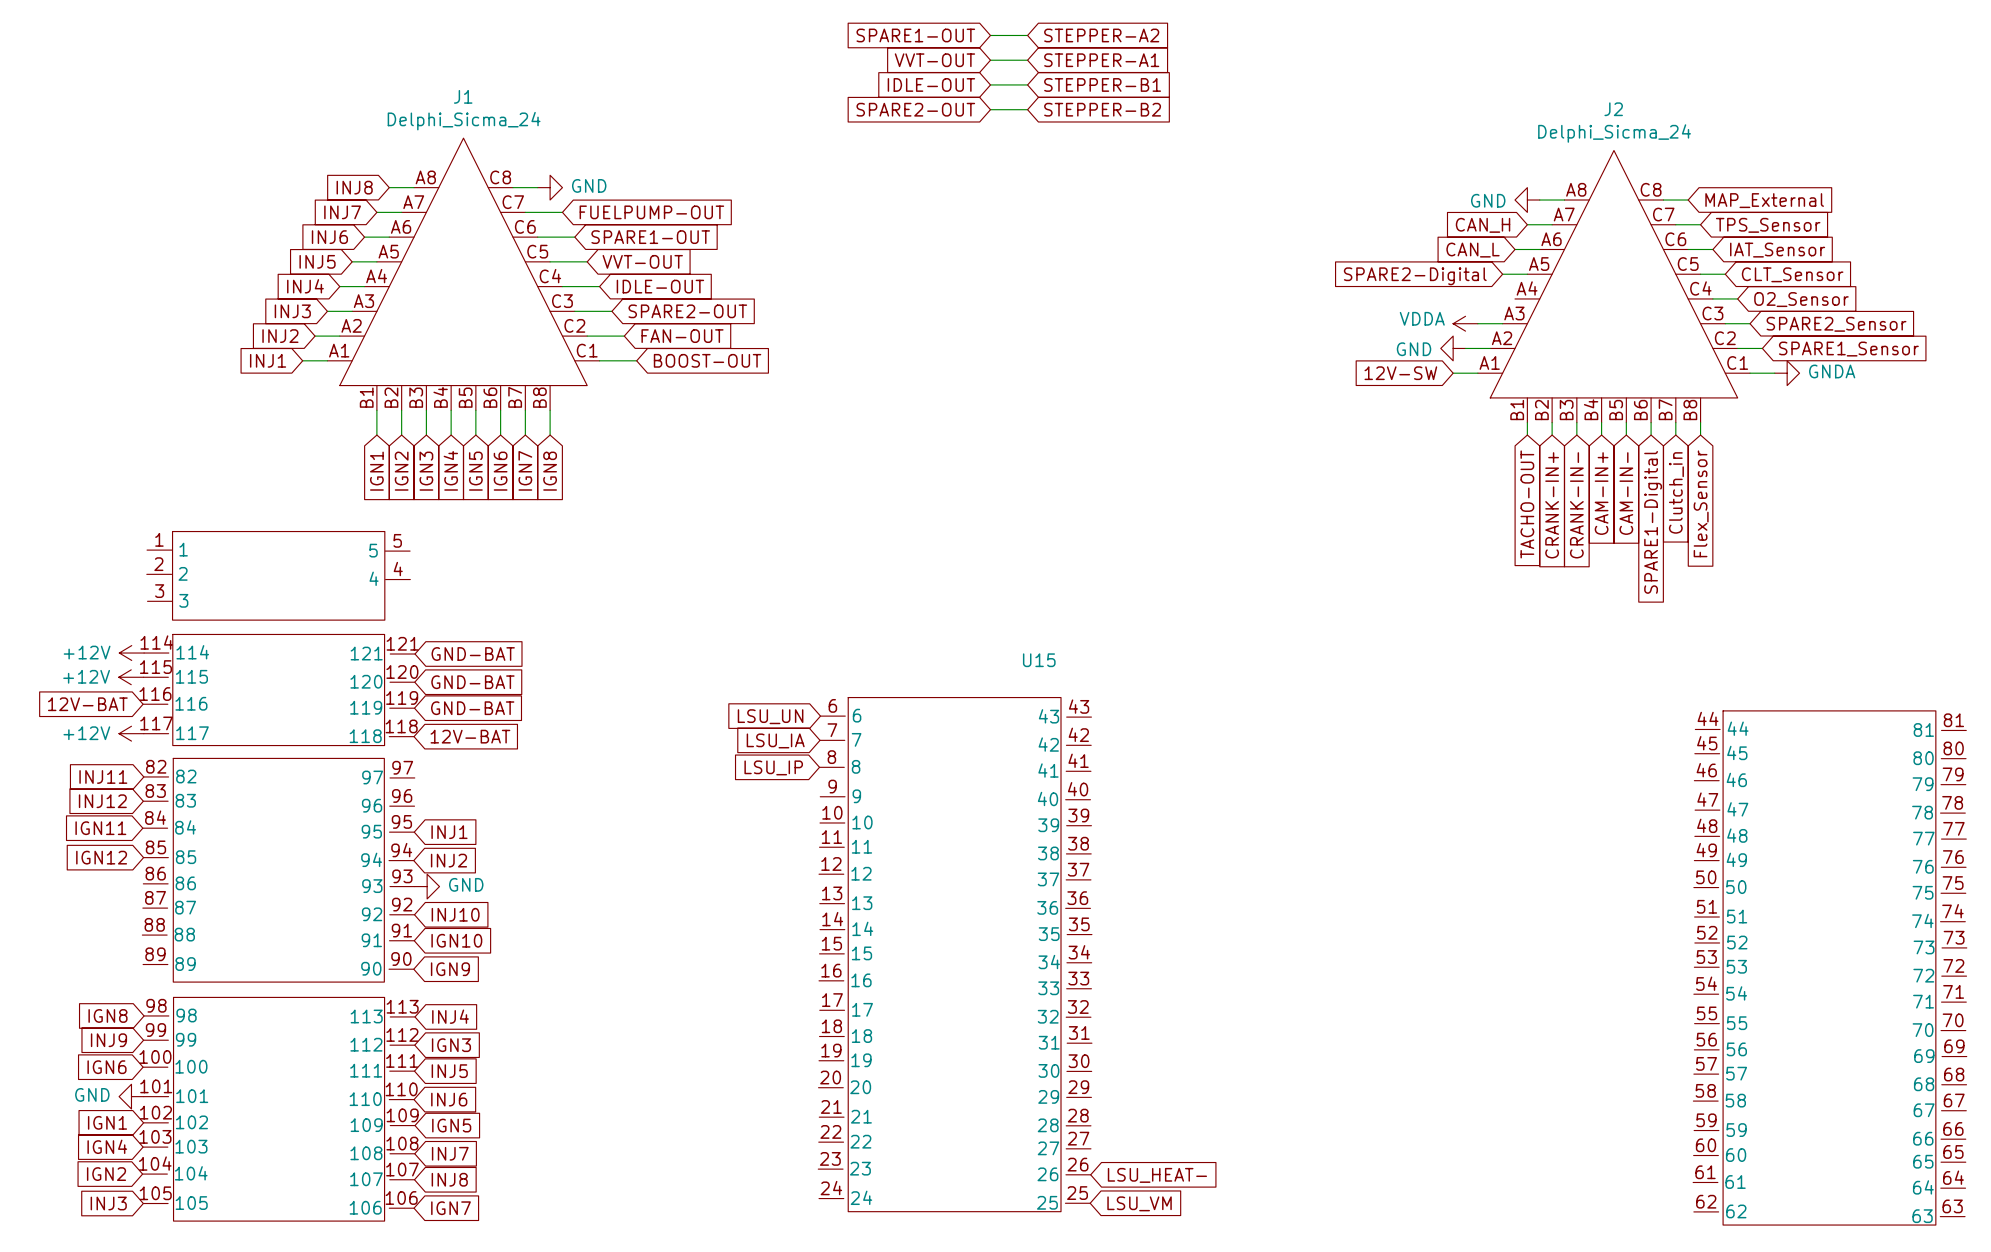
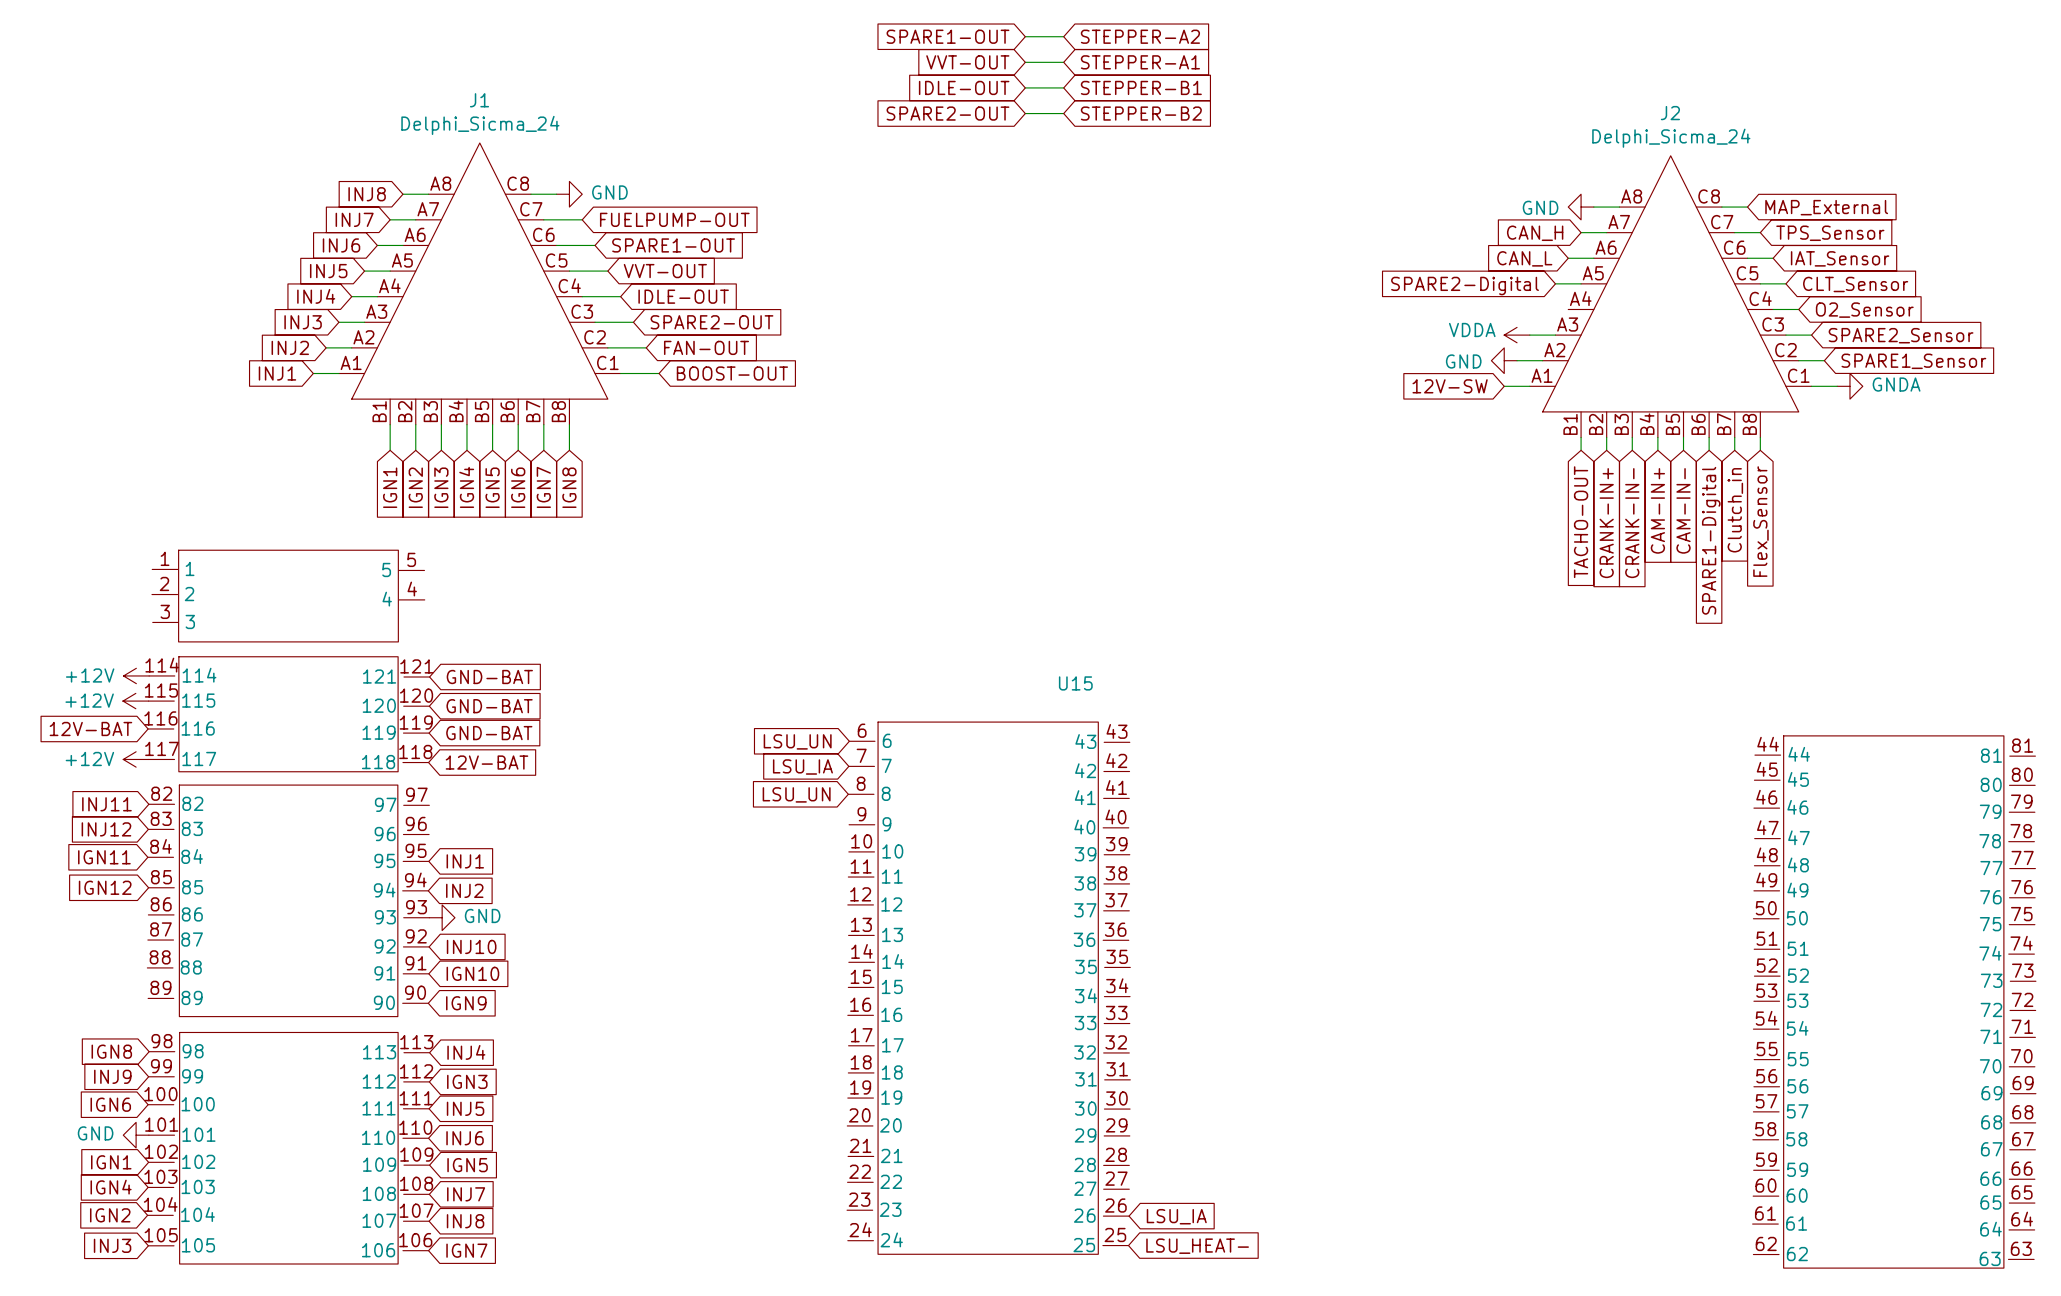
global label: LSU_IP (773, 767) -> LSU_UN (796, 794)
global label: LSU_HEAT- (1157, 1175) -> LSU_IA (1176, 1216)
global label: LSU_VM (1139, 1203) -> LSU_HEAT- (1197, 1246)

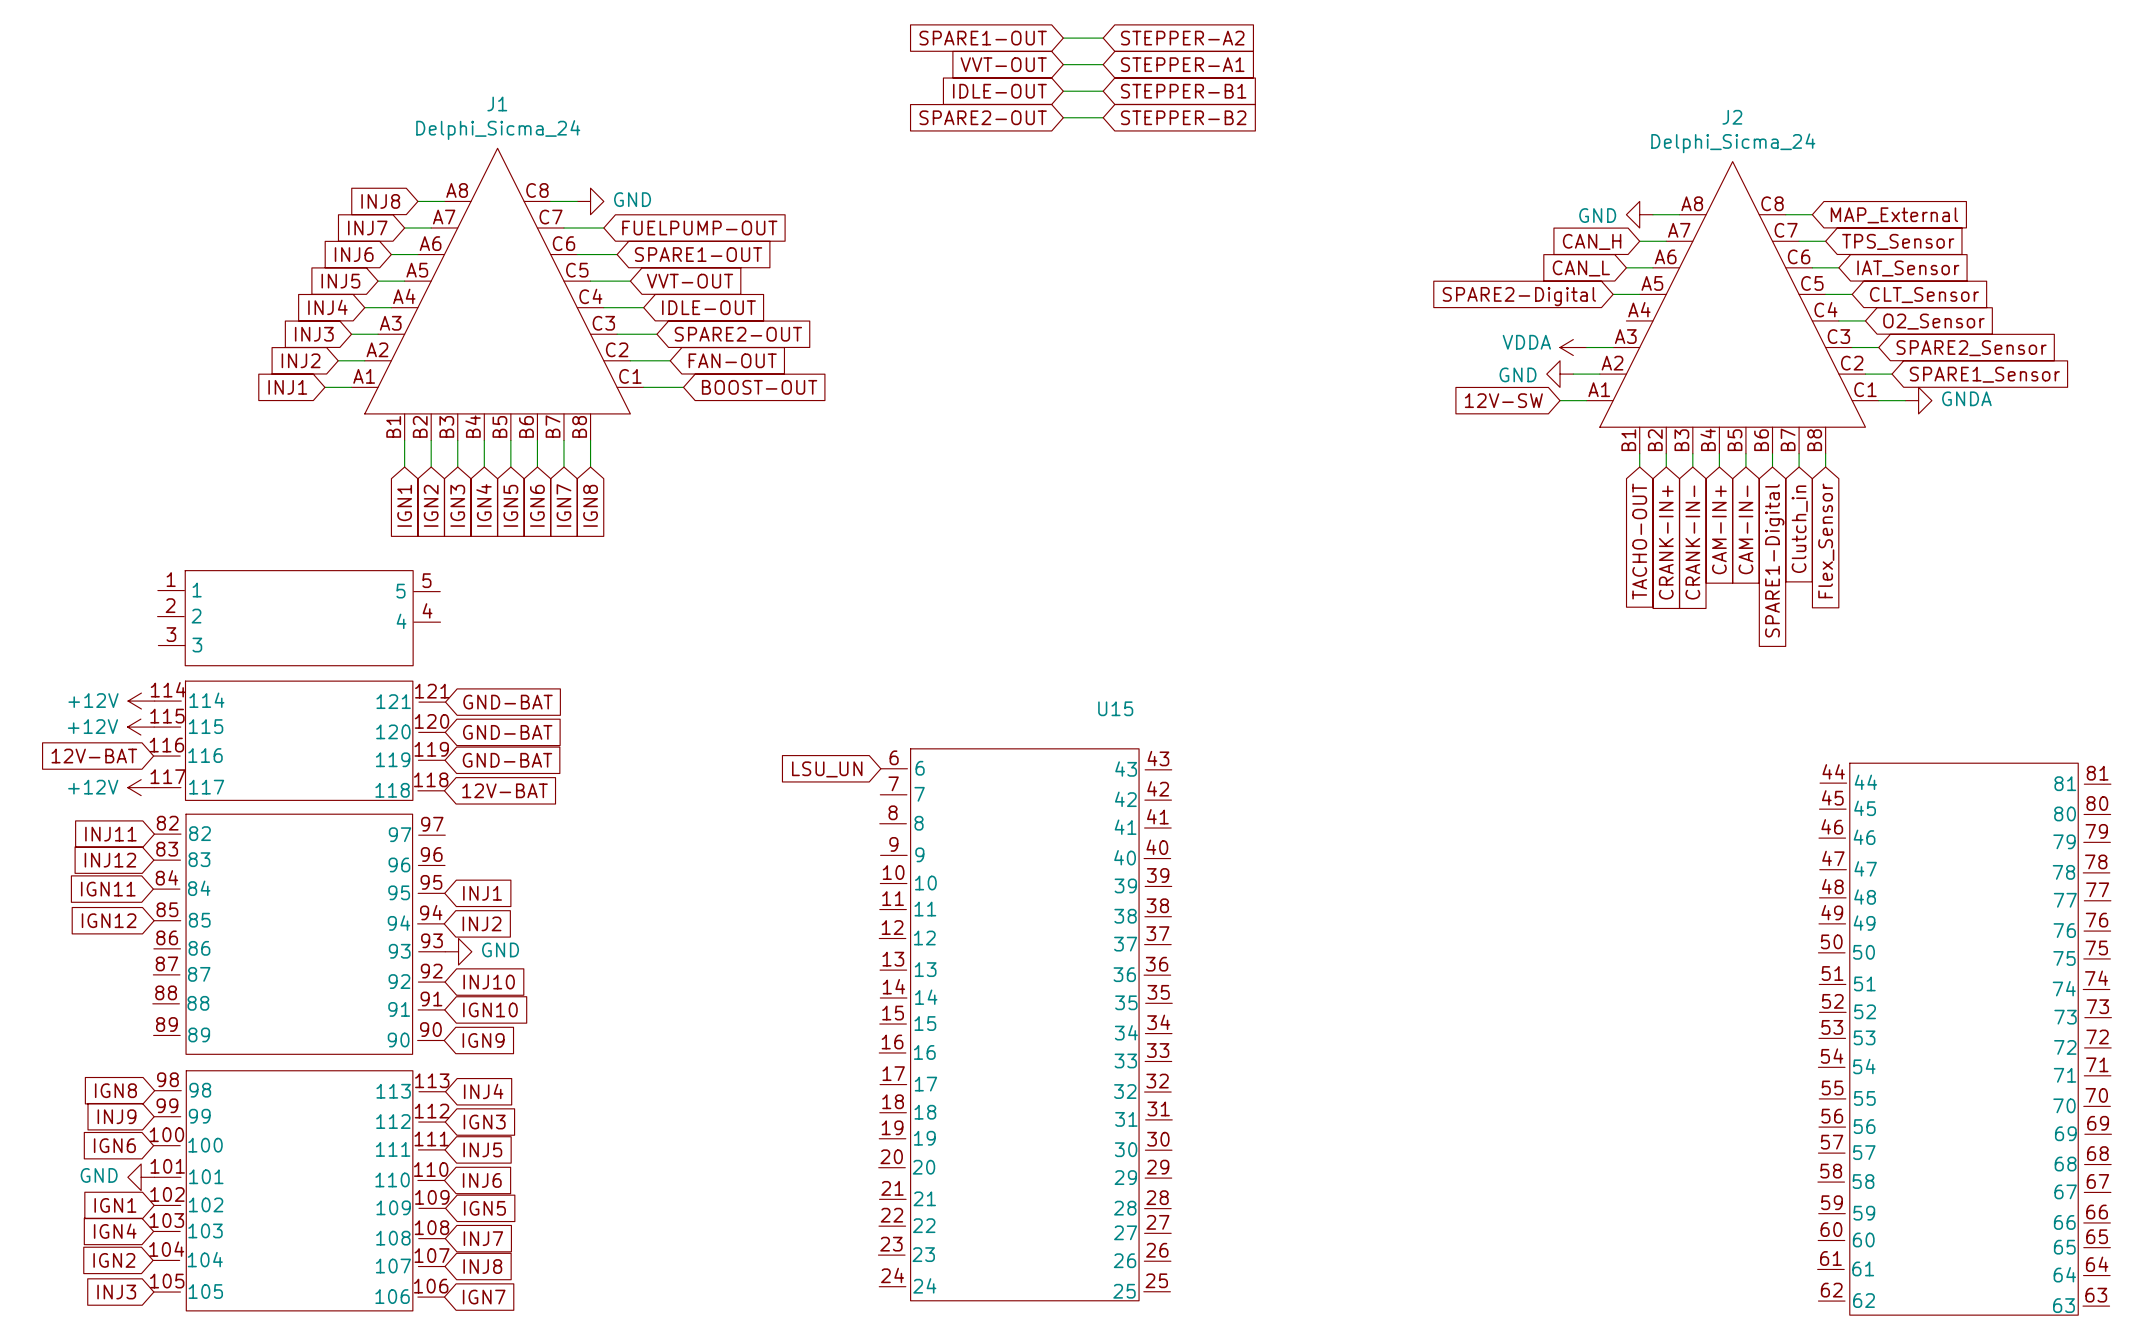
global label: LSU_IA (802, 766) -> none
global label: LSU_UN (796, 794) -> none
global label: LSU_IA (1176, 1216) -> none
global label: LSU_HEAT- (1197, 1246) -> none

